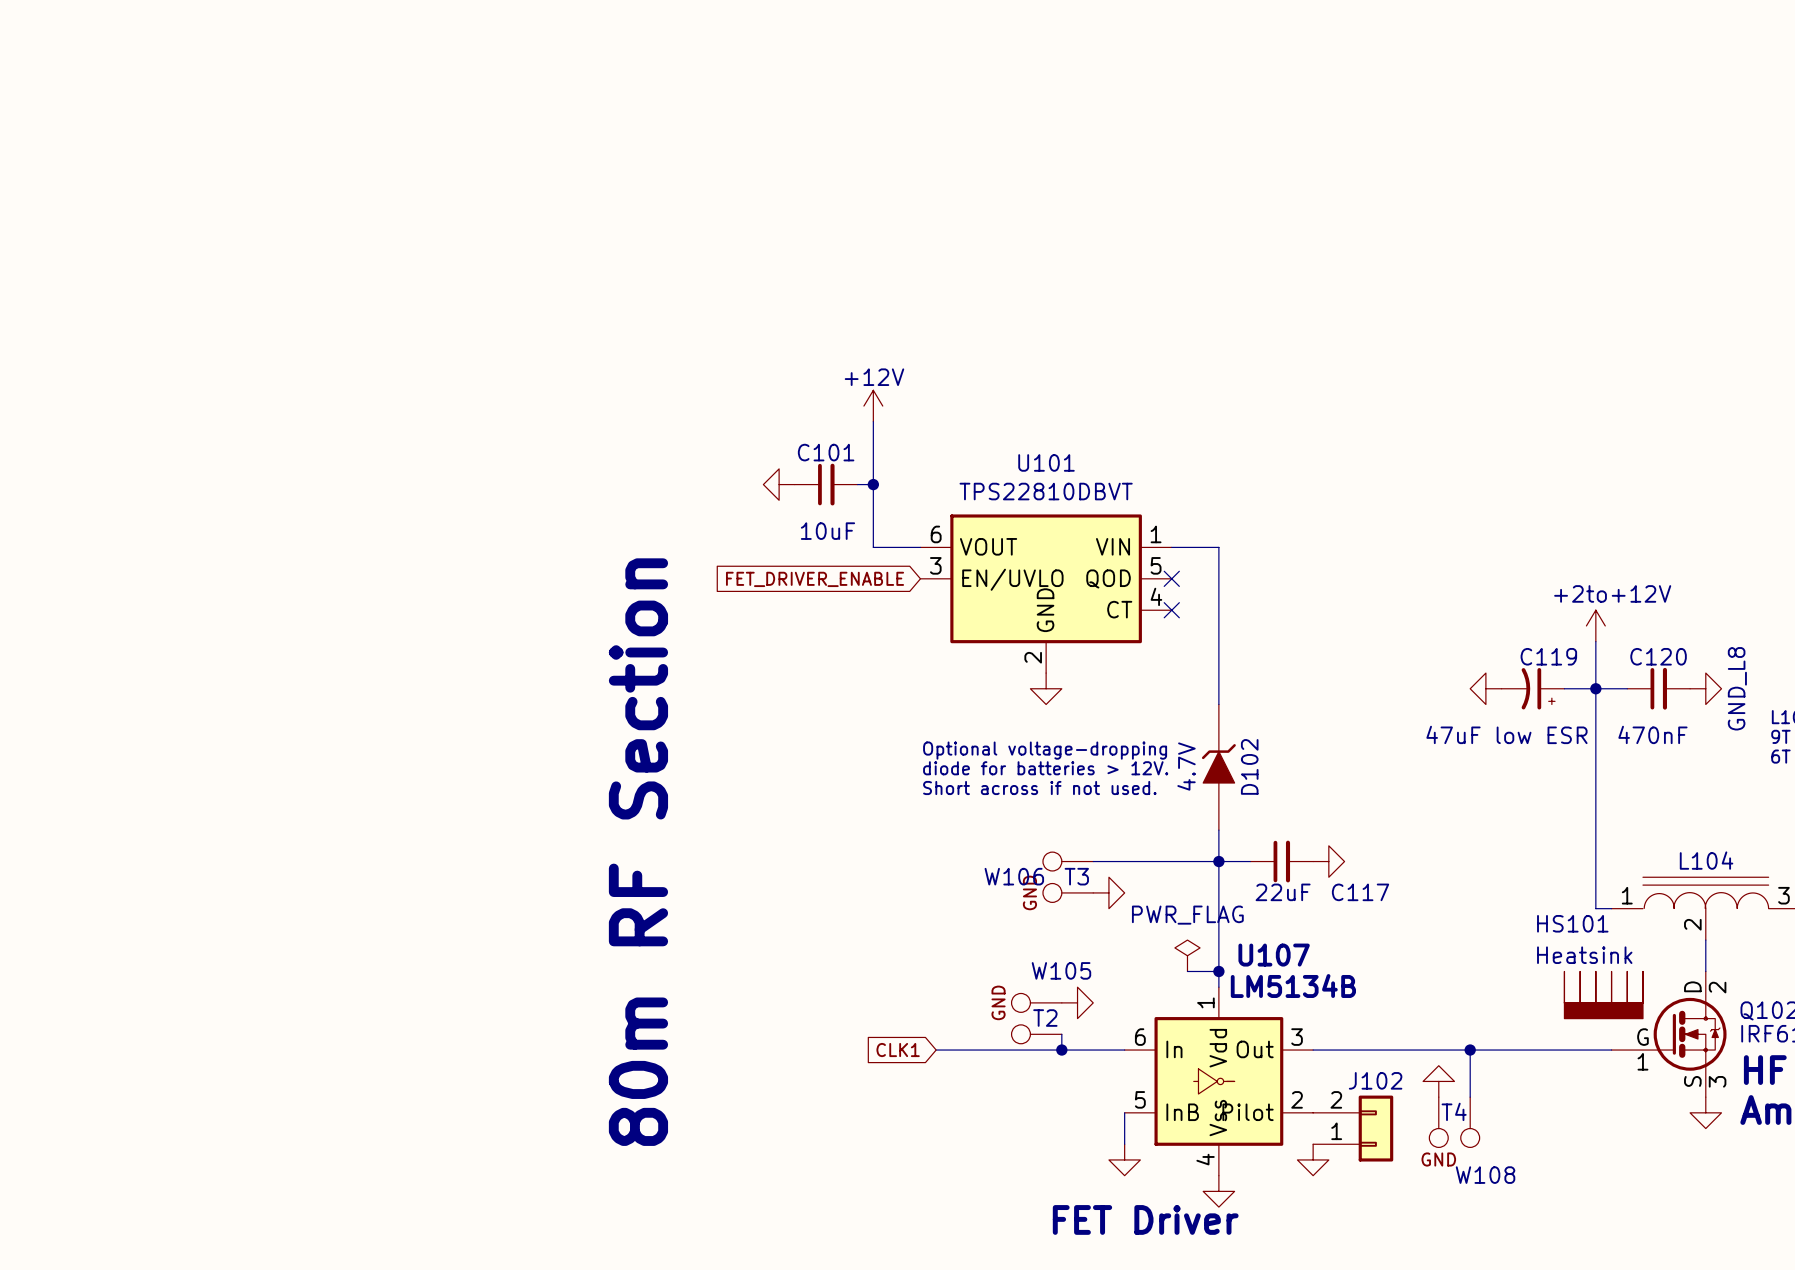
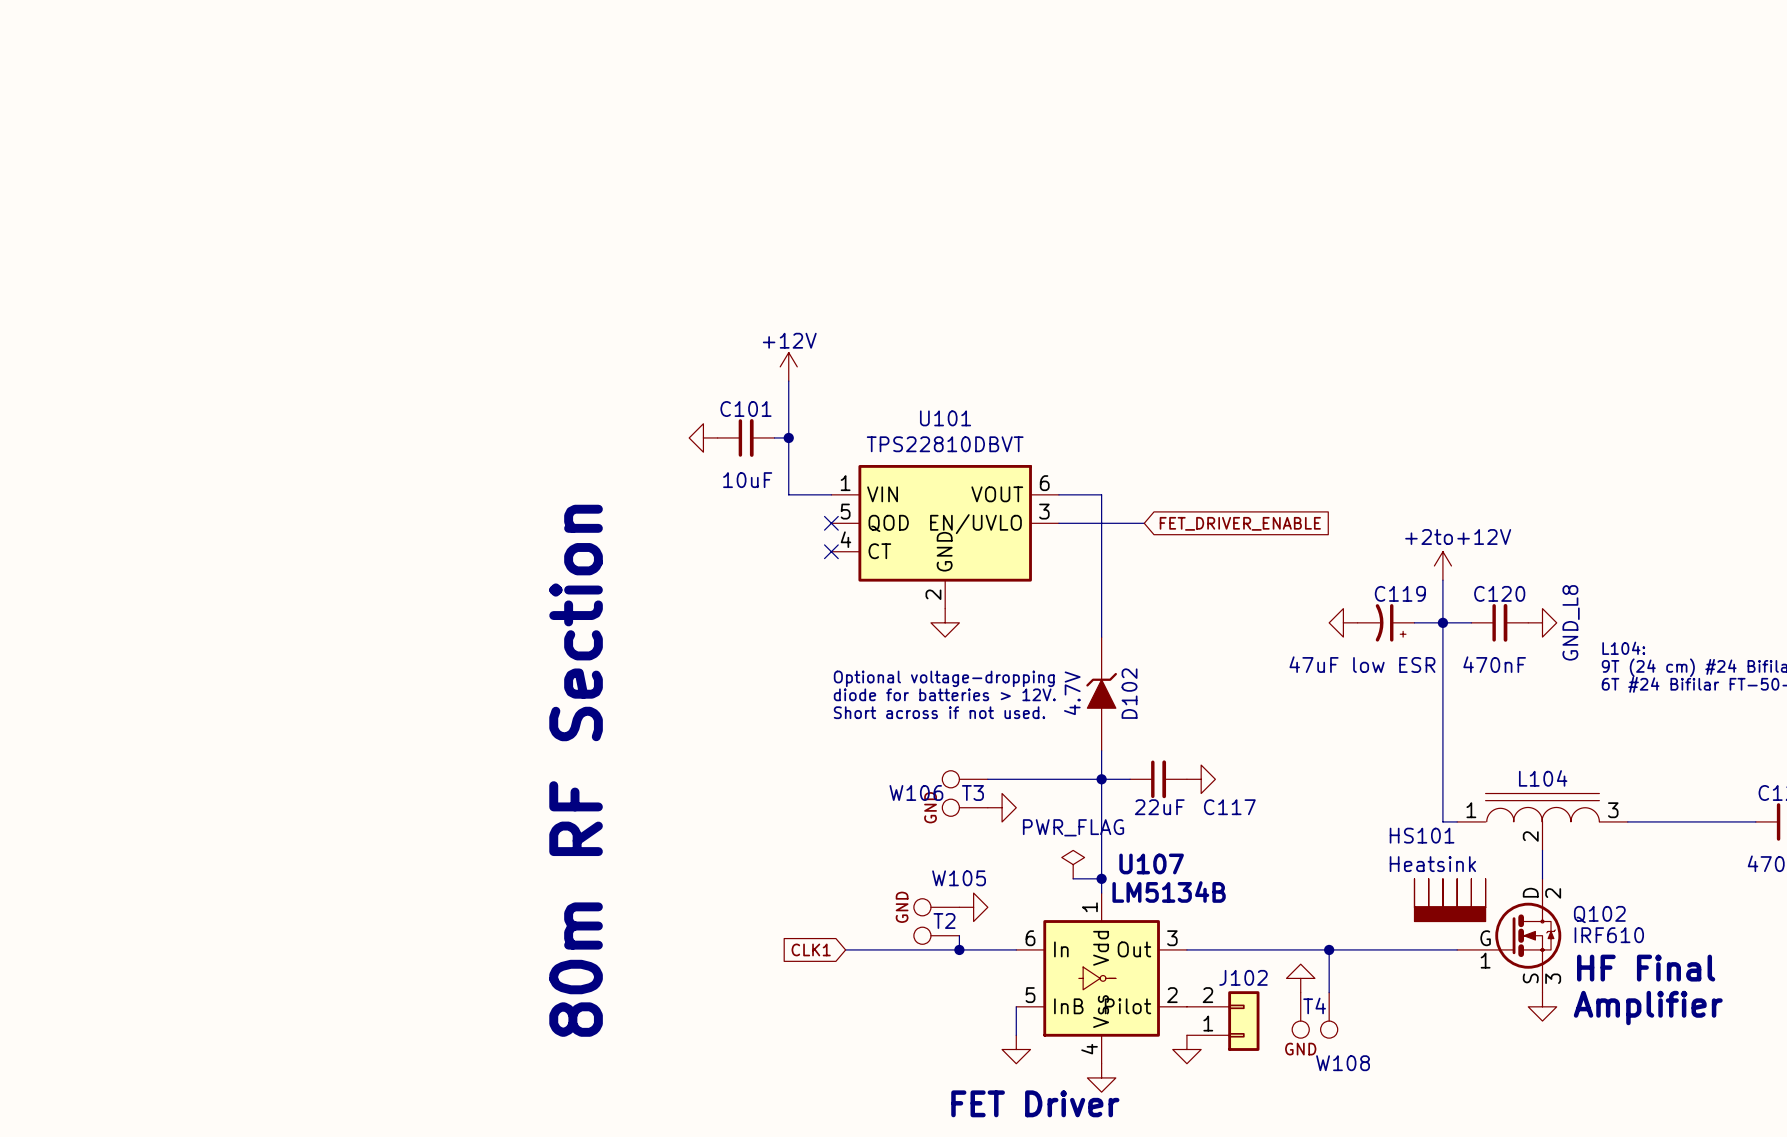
no-connect mark: none -> (831, 523)
U101 flip: as is (1046, 578) -> left-right (945, 523)
wire: none -> (1058, 523) (1144, 523)
no-connect mark: (1171, 578) -> none
global label: FET_DRIVER_ENABLE (815, 579) -> none
global label: none -> FET_DRIVER_ENABLE (1240, 523)
no-connect mark: none -> (831, 551)
no-connect mark: (1171, 610) -> none

